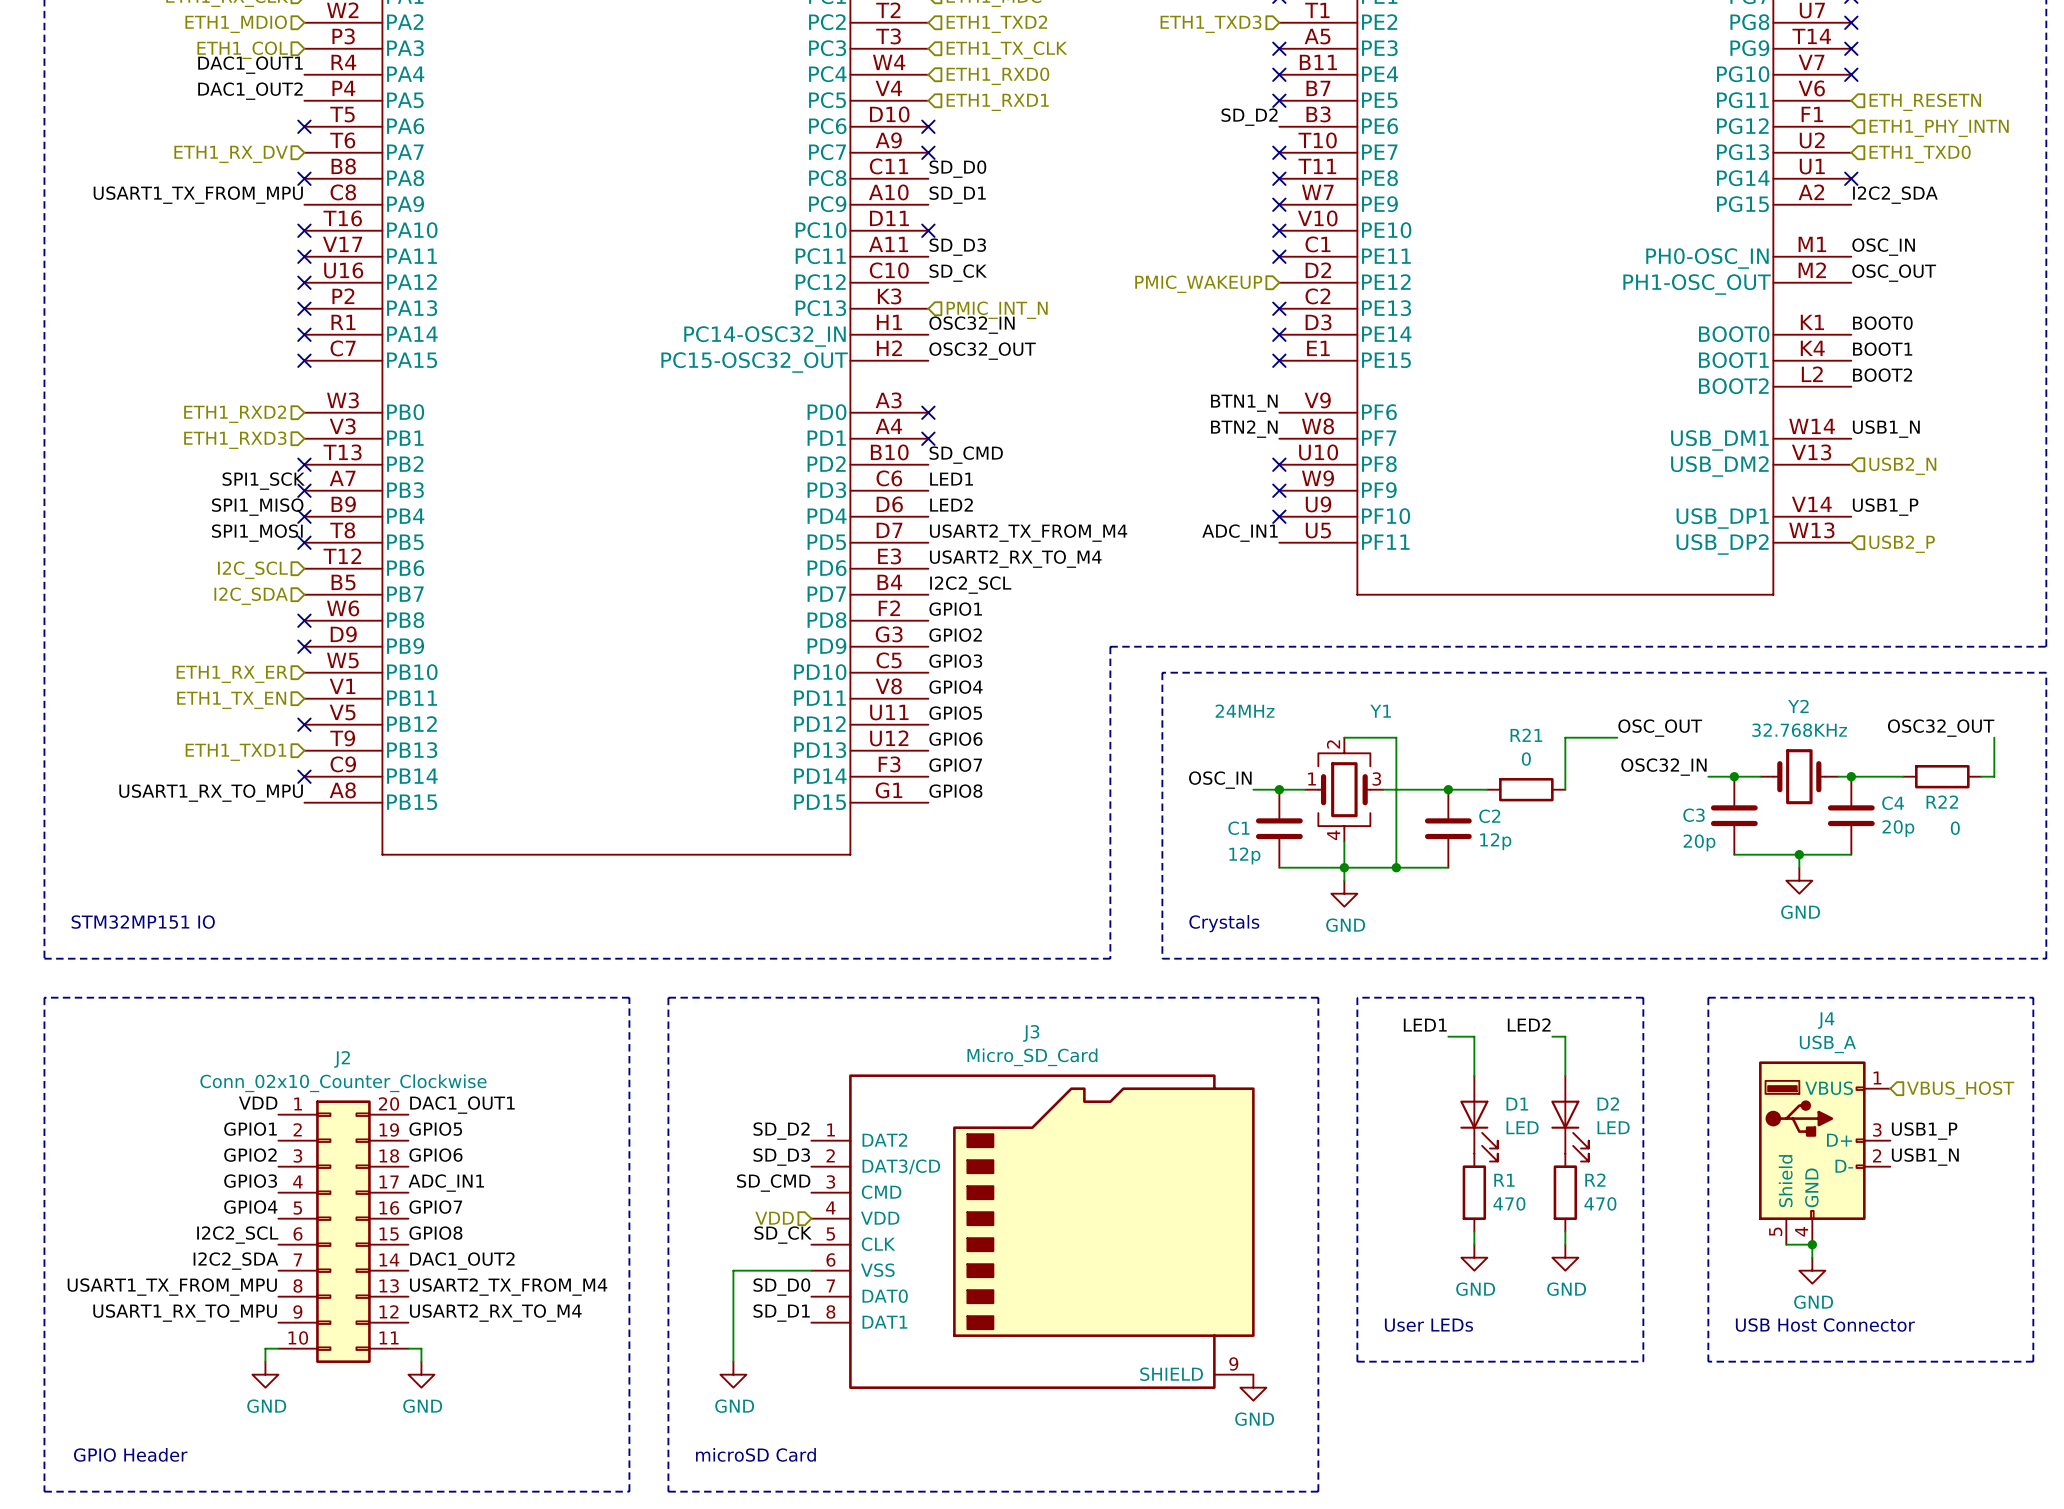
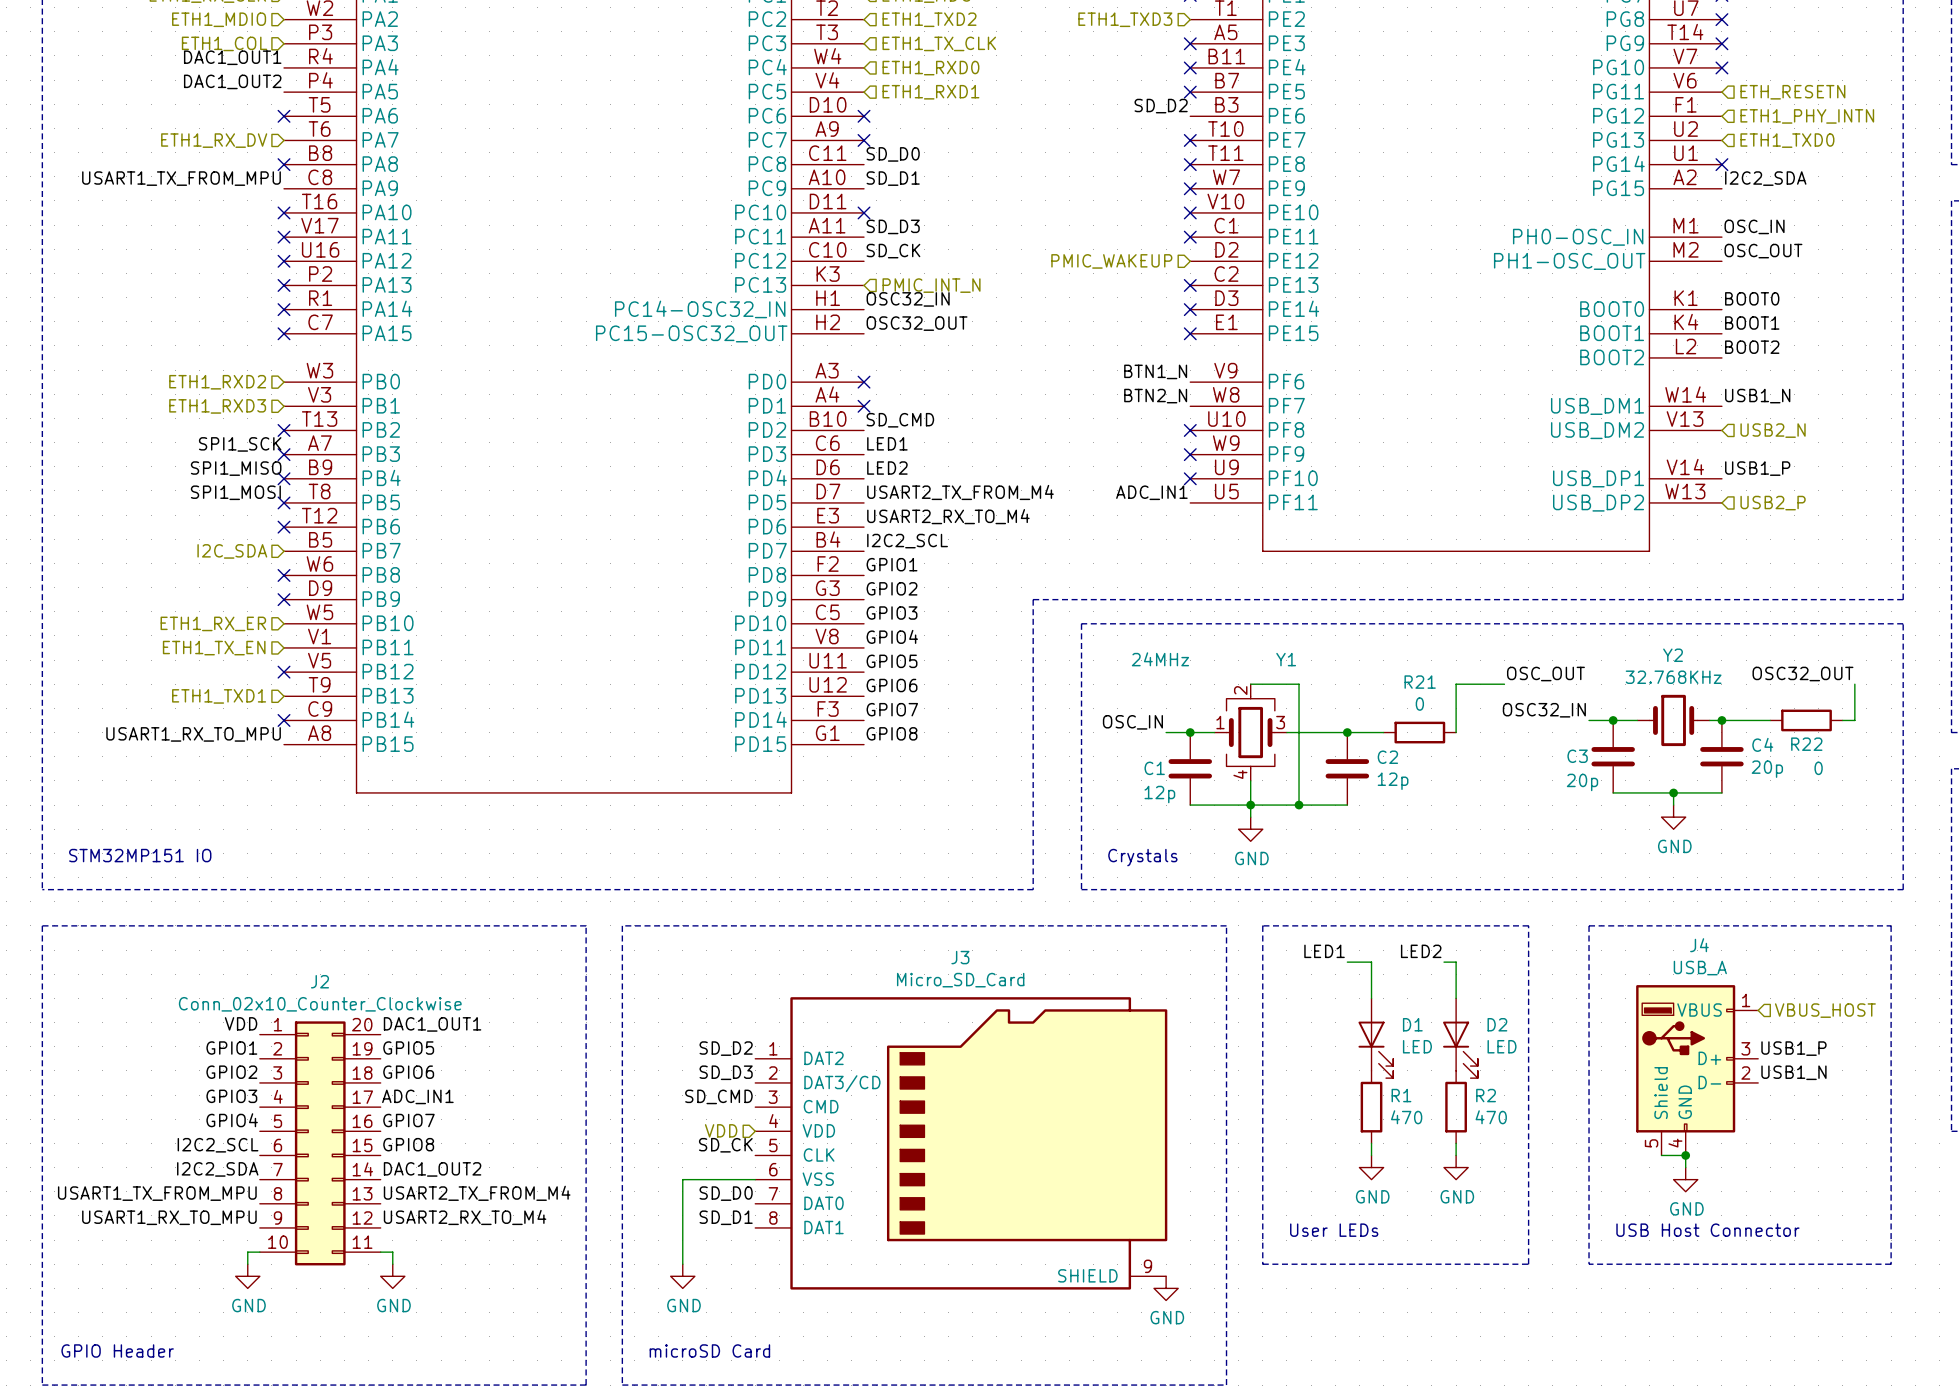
no-connect mark: none -> (284, 527)
hierarchical label: I2C_SCL (252, 570) -> none

